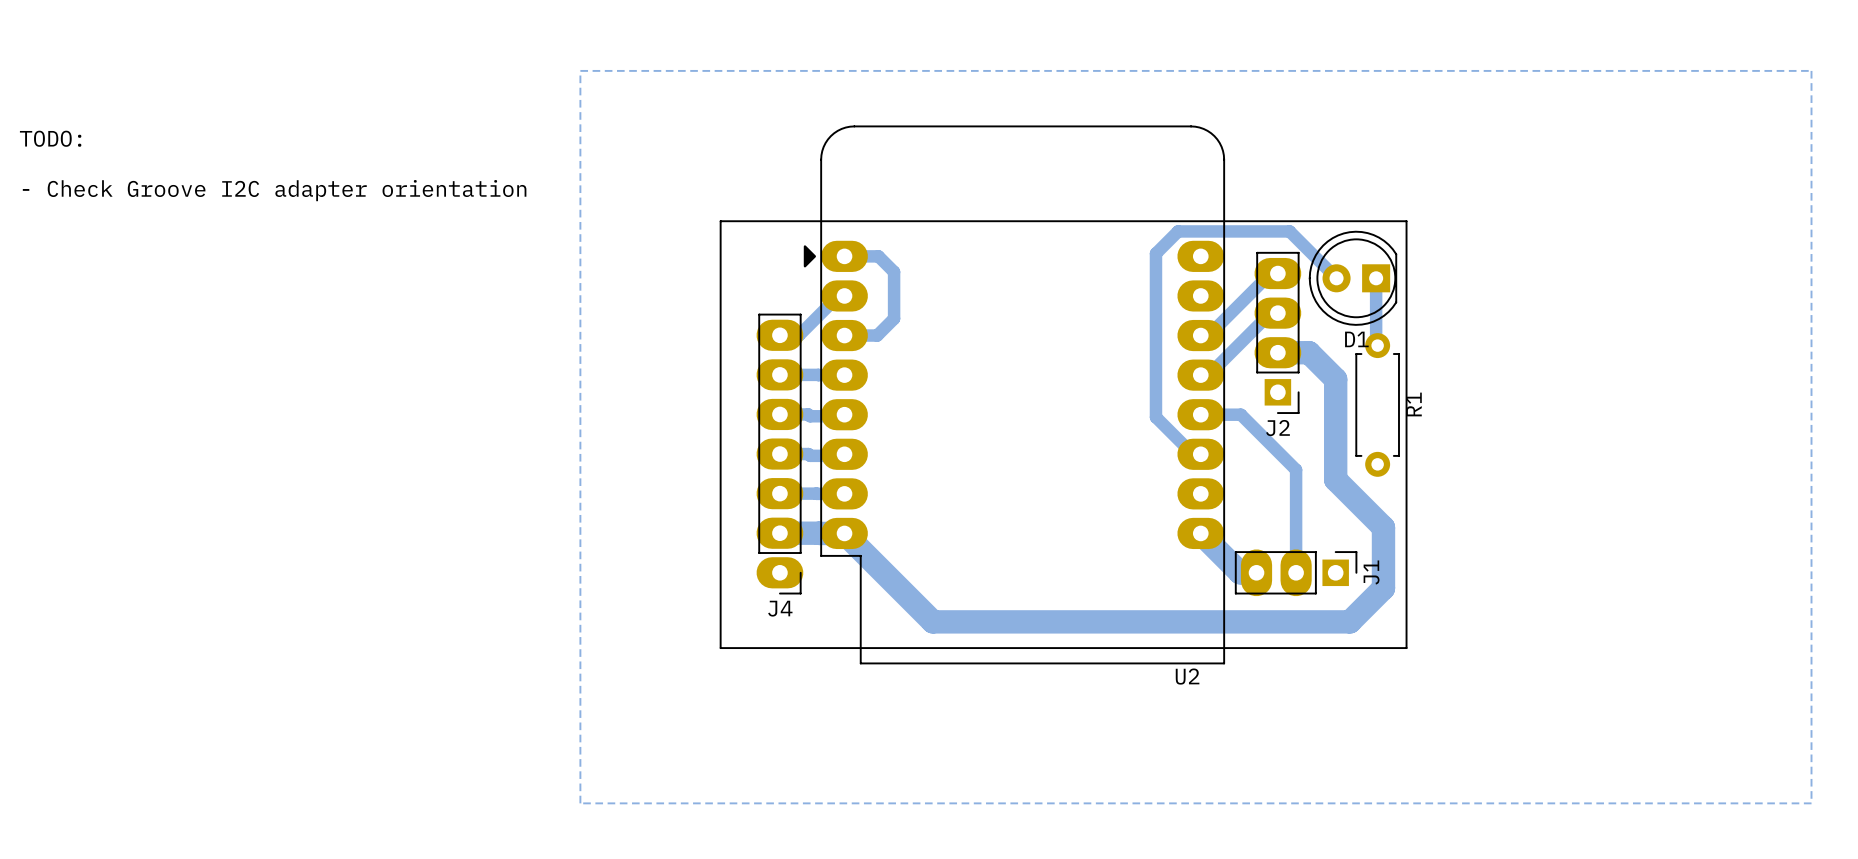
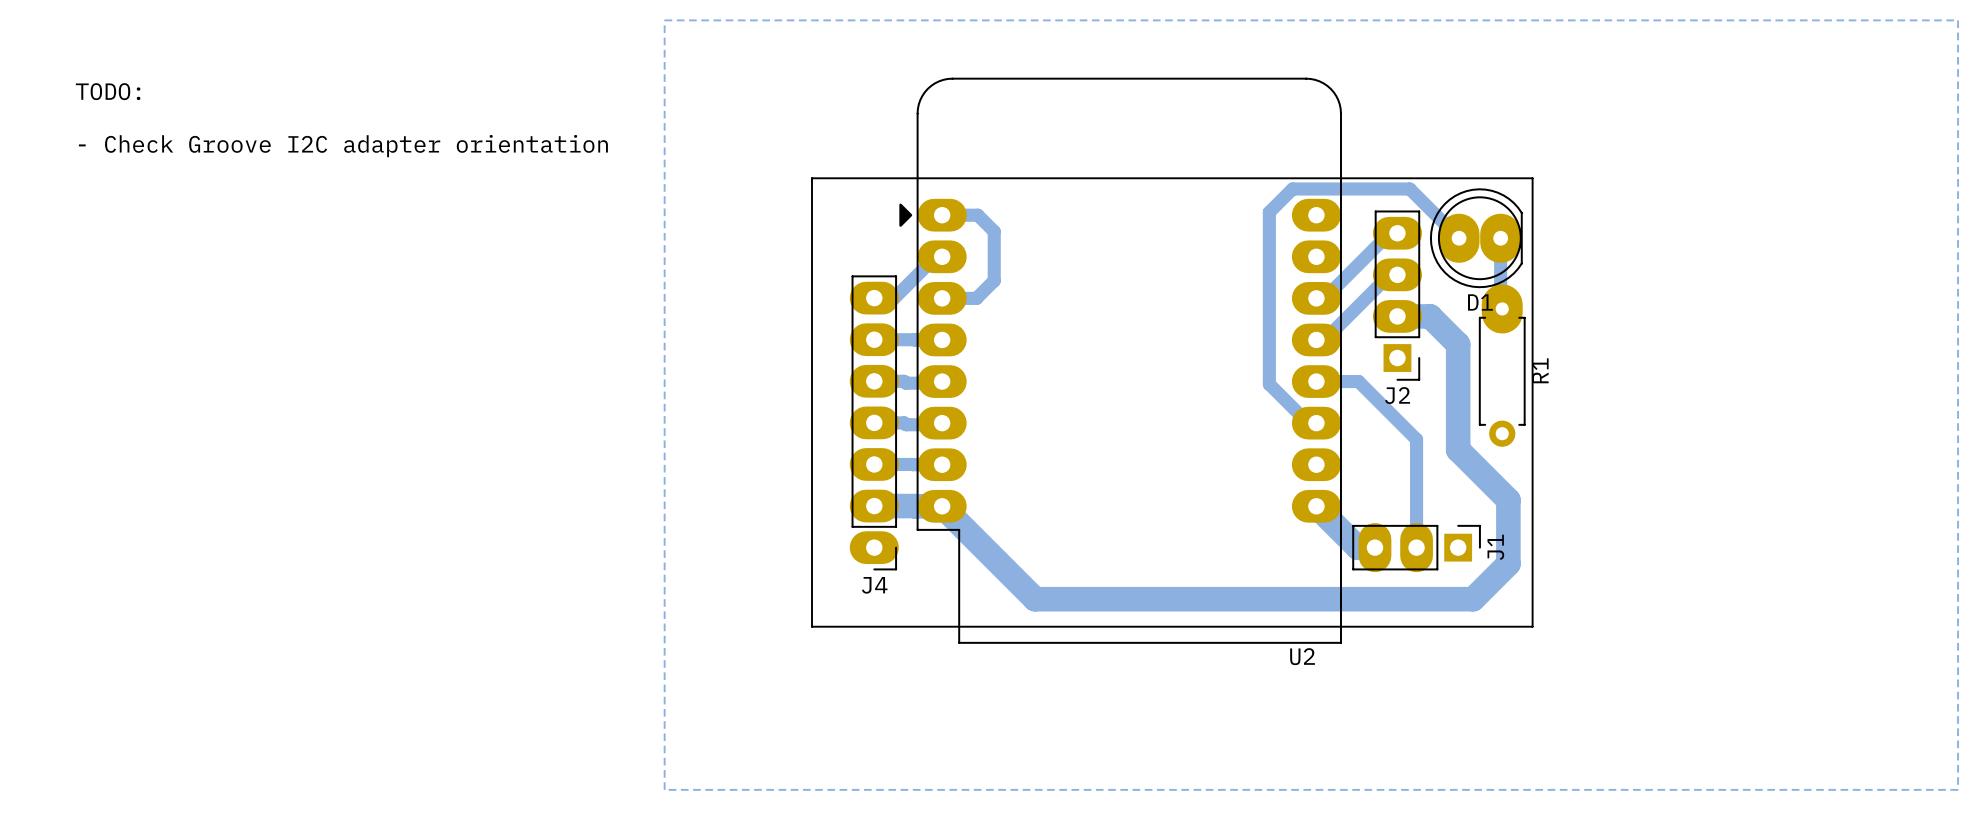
D1 footprint: [1308, 230, 1398, 326] -> [1429, 188, 1523, 289]
R1 footprint: [1355, 333, 1400, 477] -> [1478, 284, 1526, 447]

